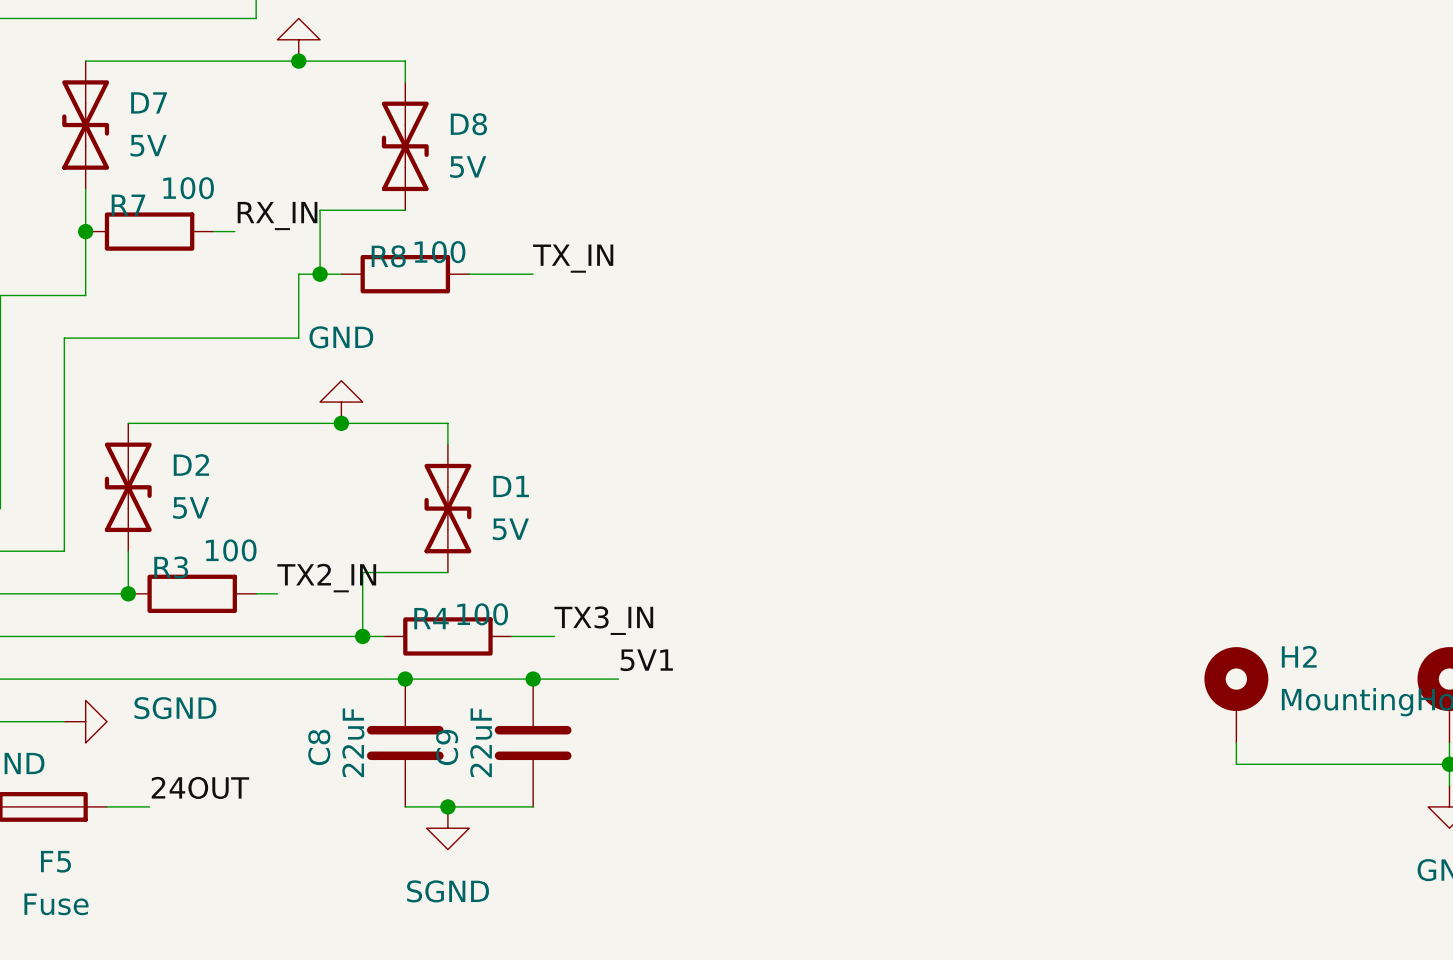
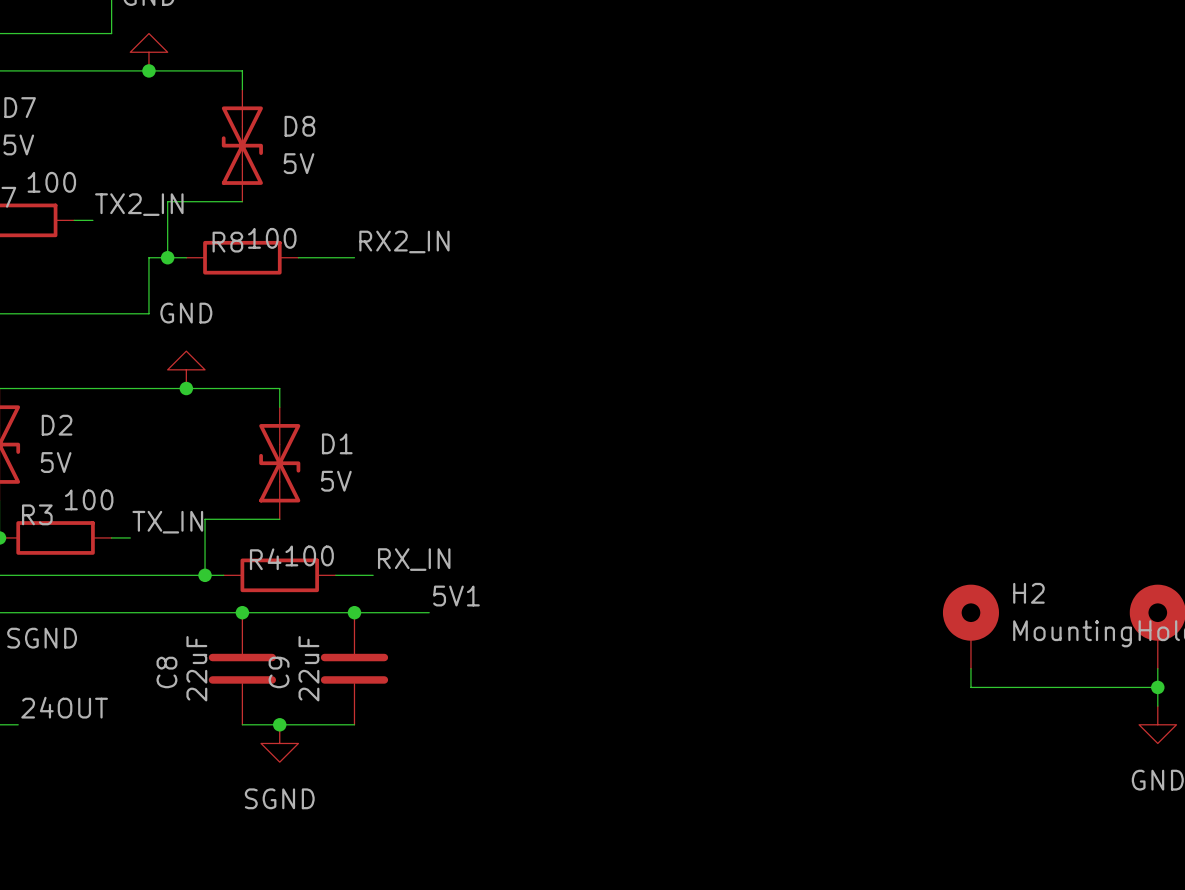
label: RX_IN (277, 216) -> TX2_IN (139, 204)
label: TX_IN (573, 258) -> RX2_IN (404, 241)
label: TX2_IN (326, 578) -> TX_IN (167, 522)
label: TX3_IN (603, 620) -> RX_IN (414, 559)

